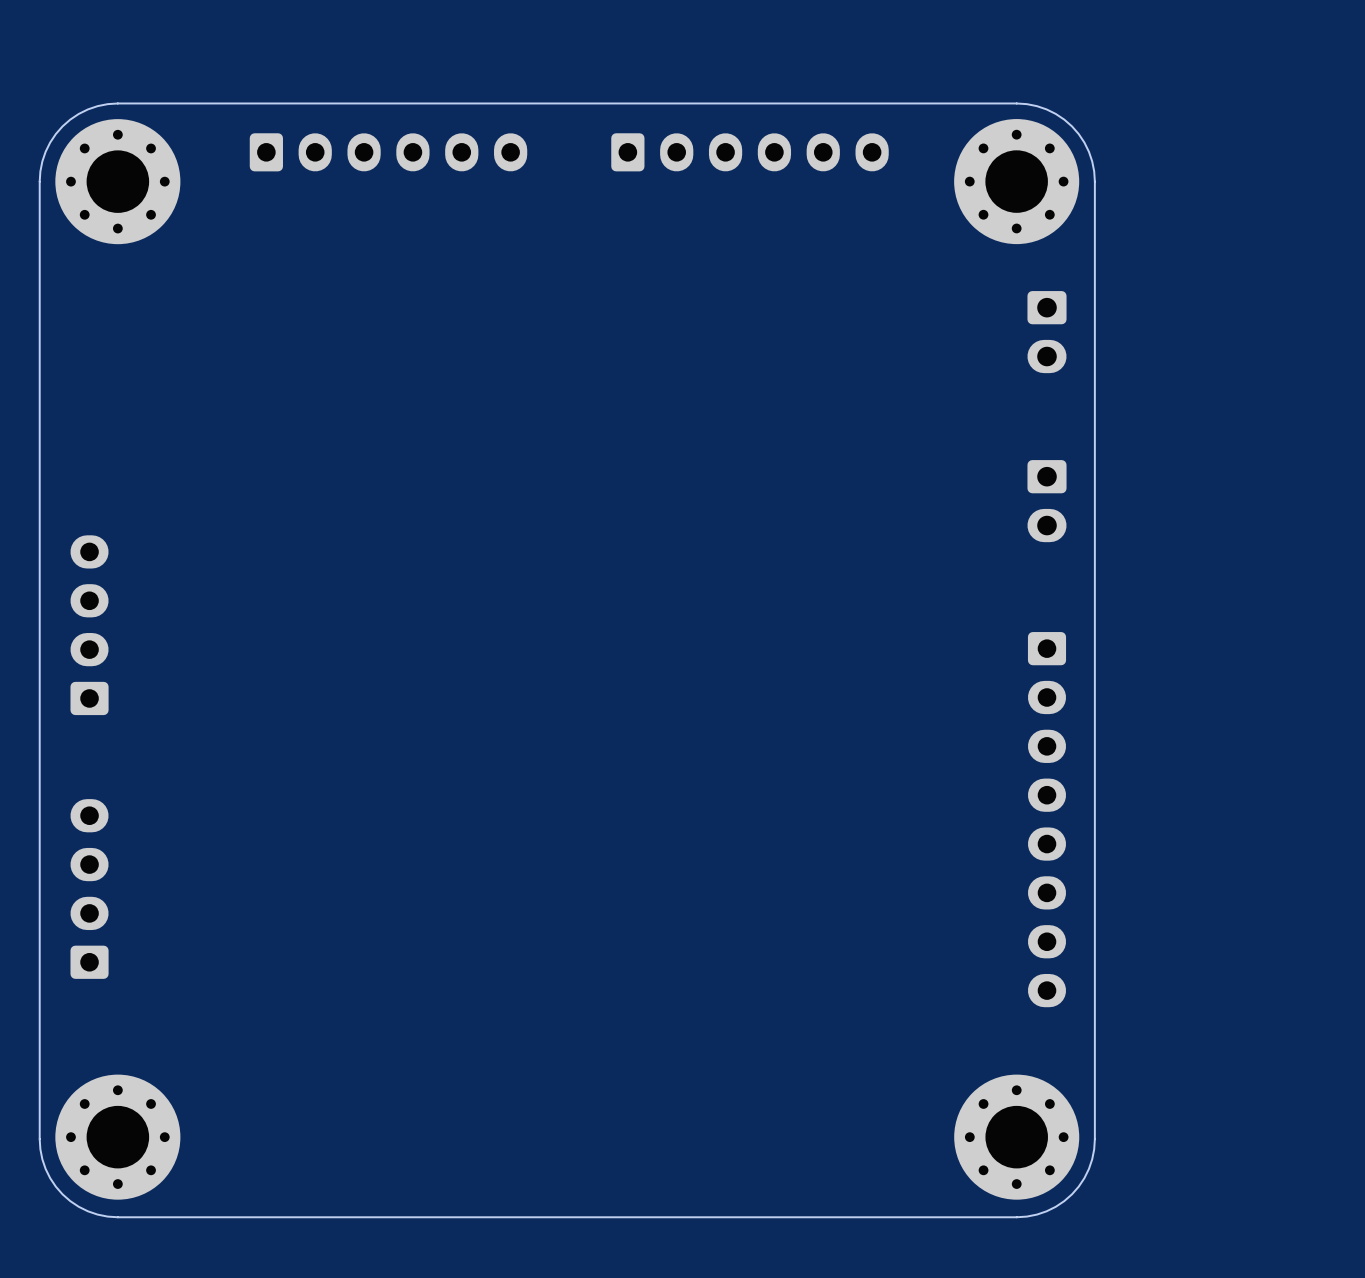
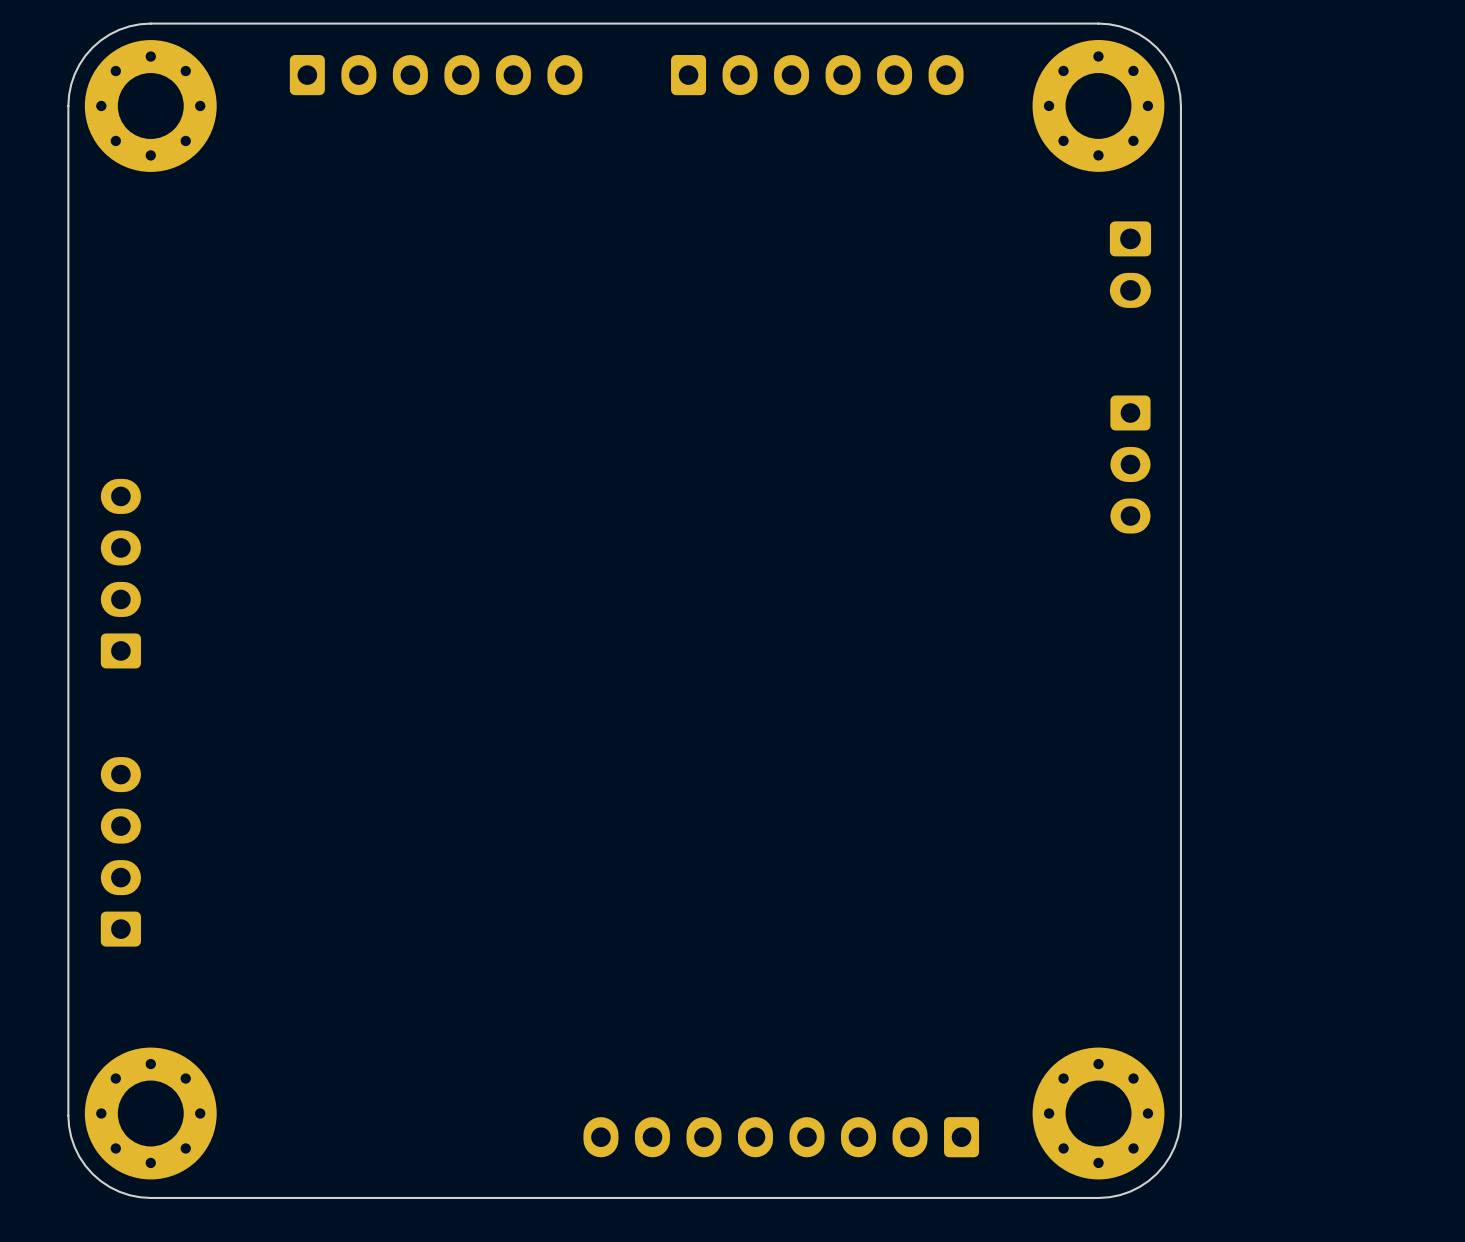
part: (1047, 501) -> none
part: none -> (1130, 464)
part rotation: 0° (1047, 819) -> 90° clockwise (781, 1137)
part position: (1047, 819) -> (781, 1137)

